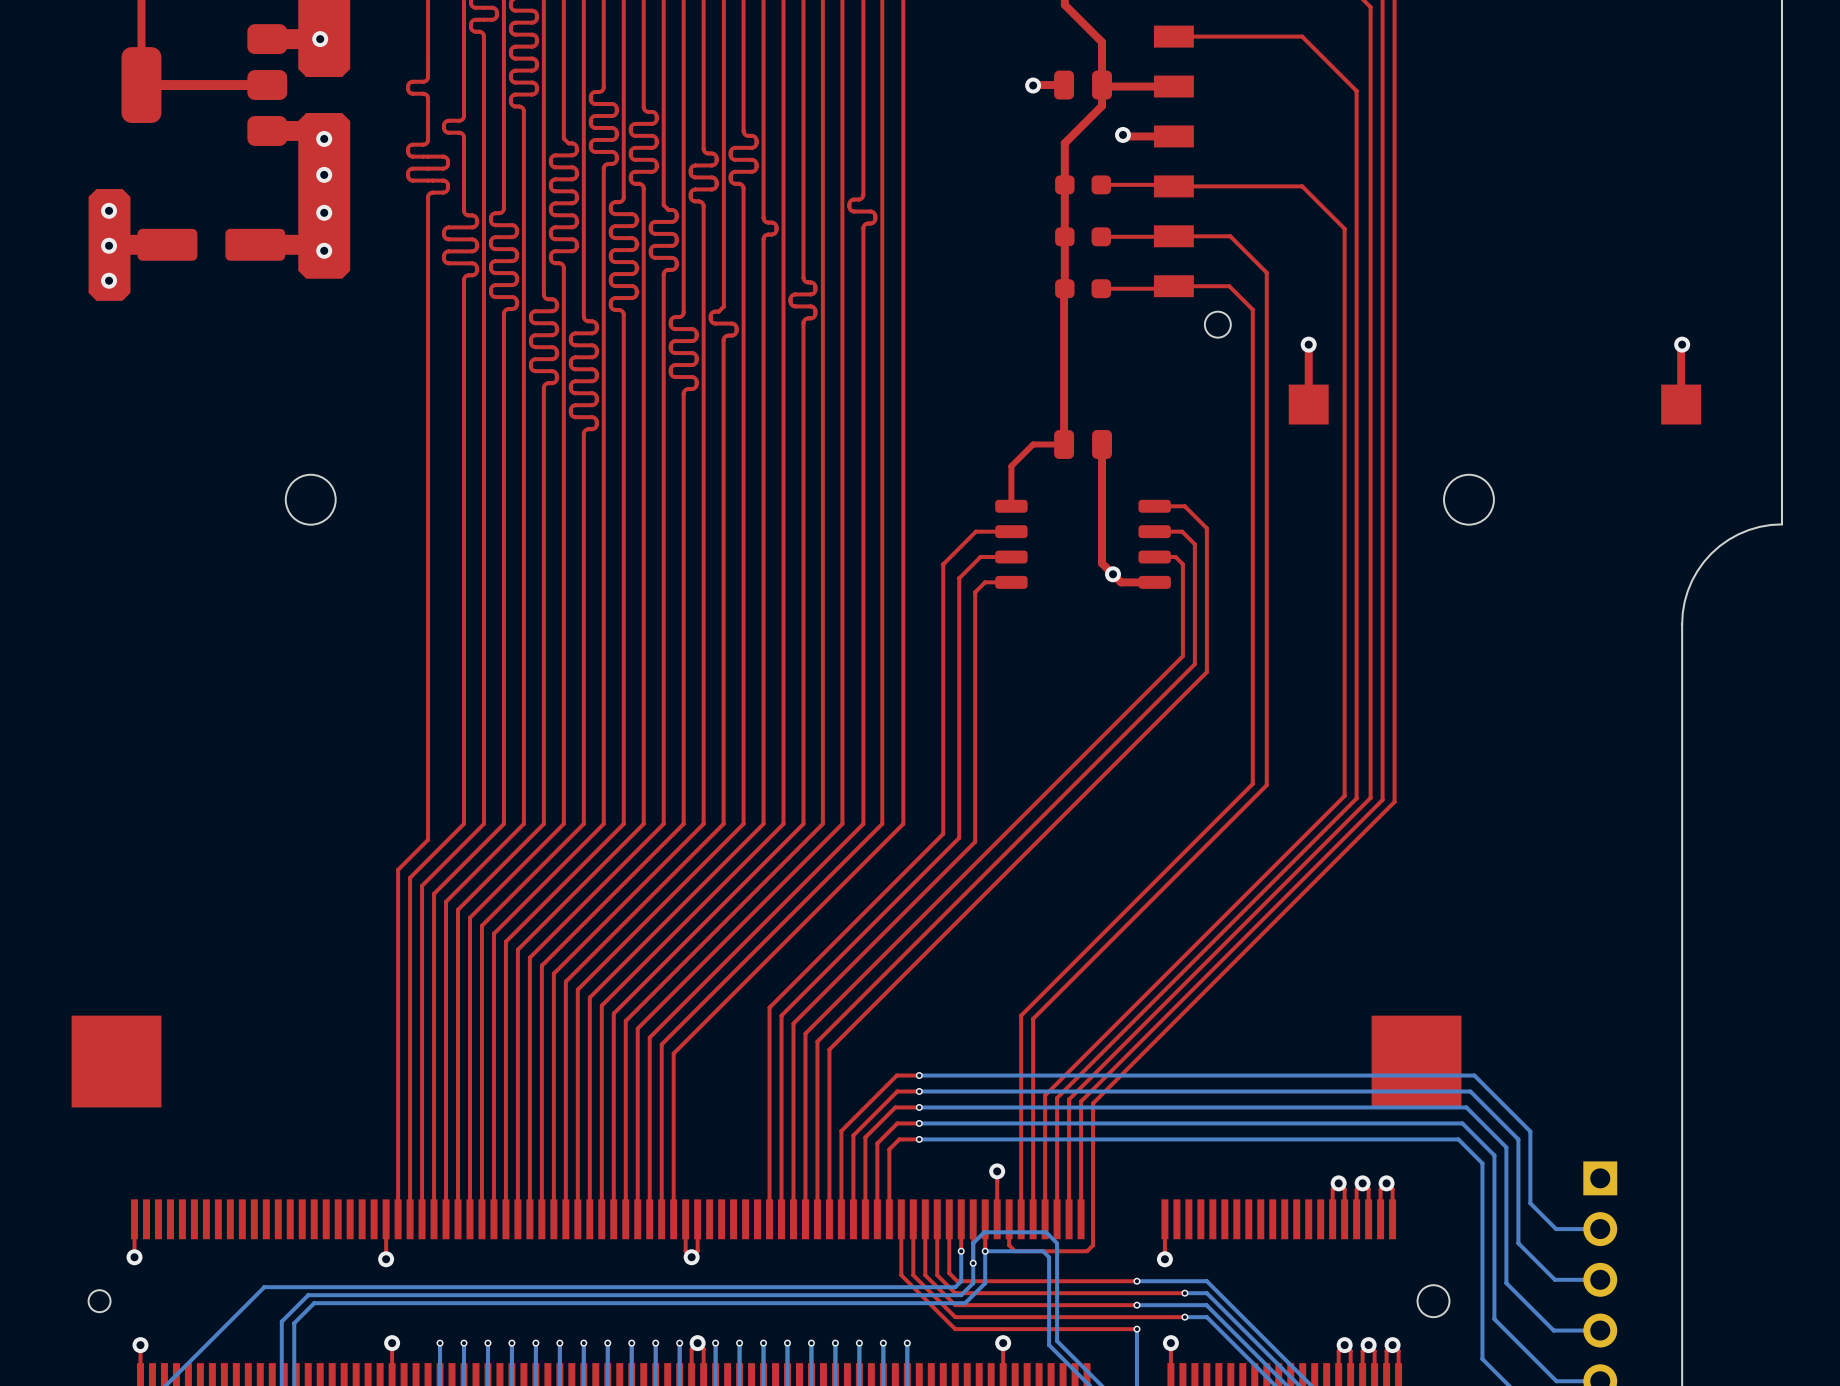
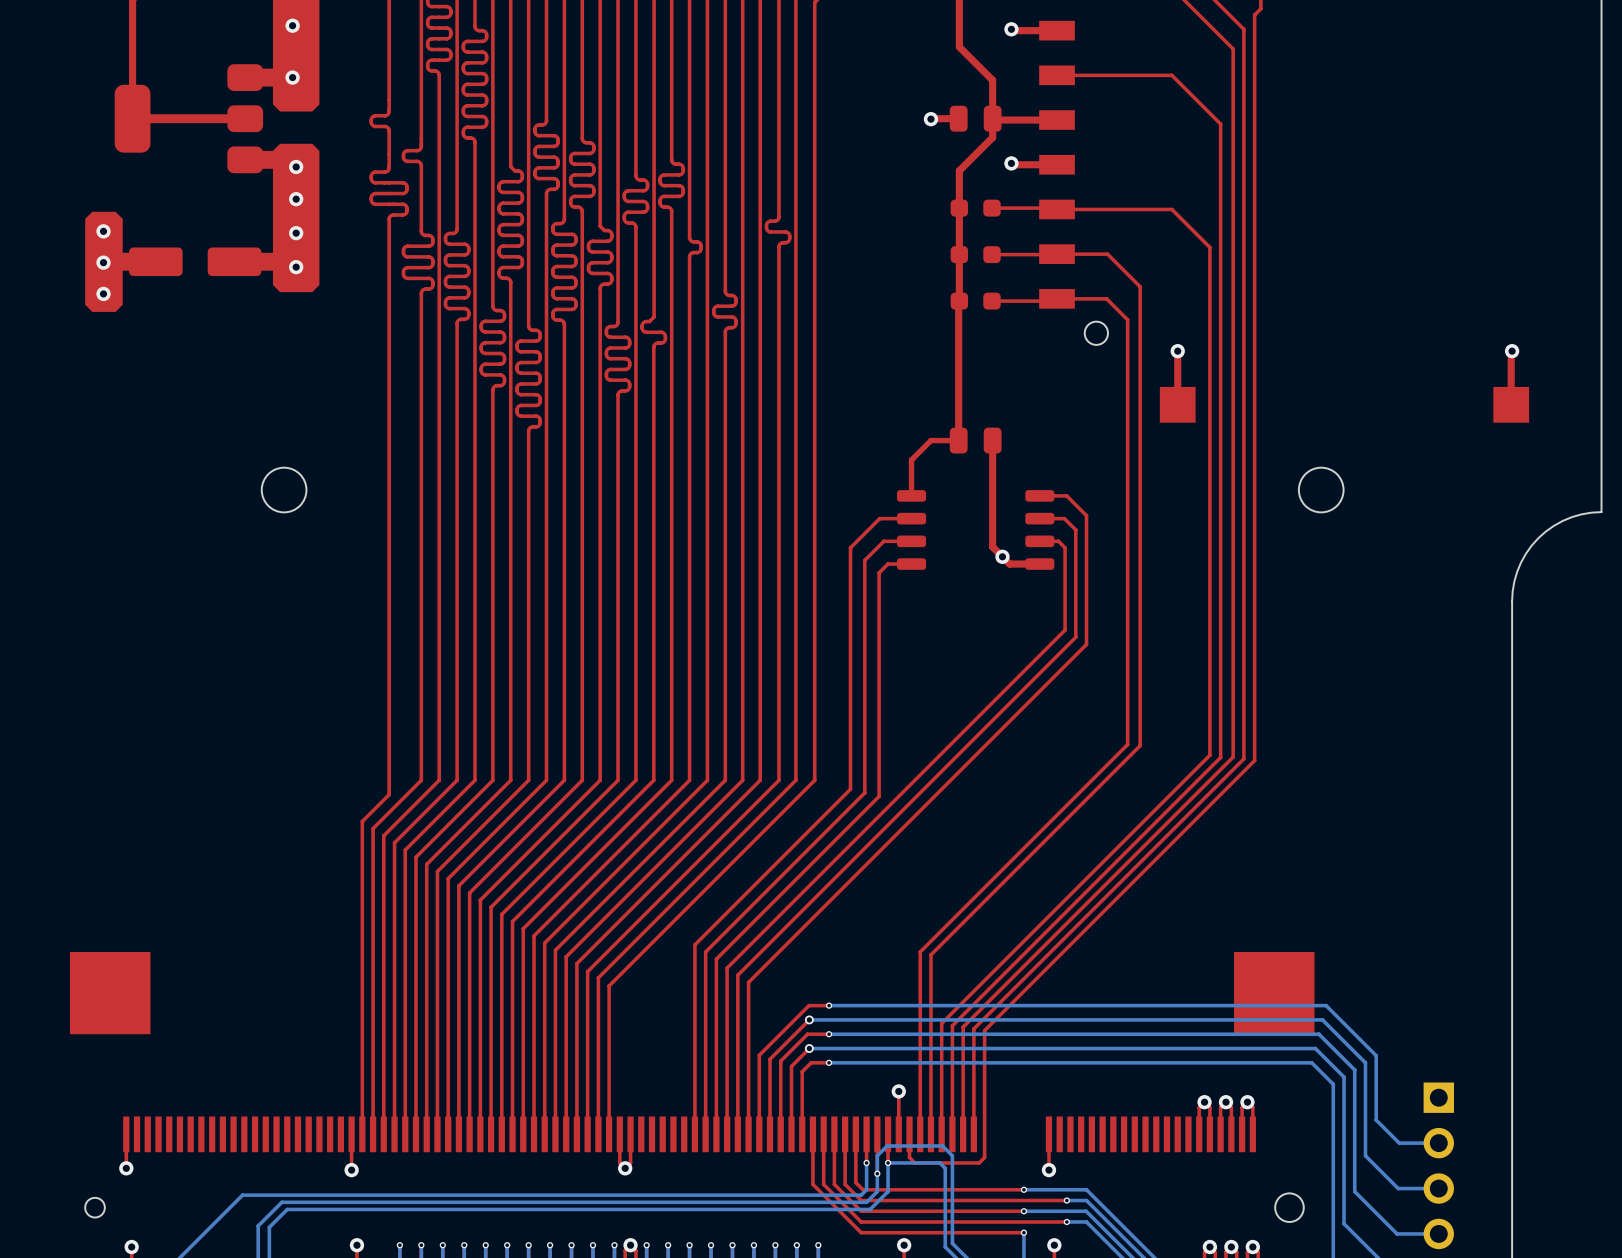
via: none -> (809, 1019)
top track: (919, 1091) (897, 1091) -> none
bottom track: none -> (829, 1019) (809, 1019)
via: (919, 1091) -> none
via: none -> (809, 1048)
top track: (919, 1123) (897, 1123) -> none
bottom track: none -> (829, 1048) (809, 1048)
via: (919, 1123) -> none

